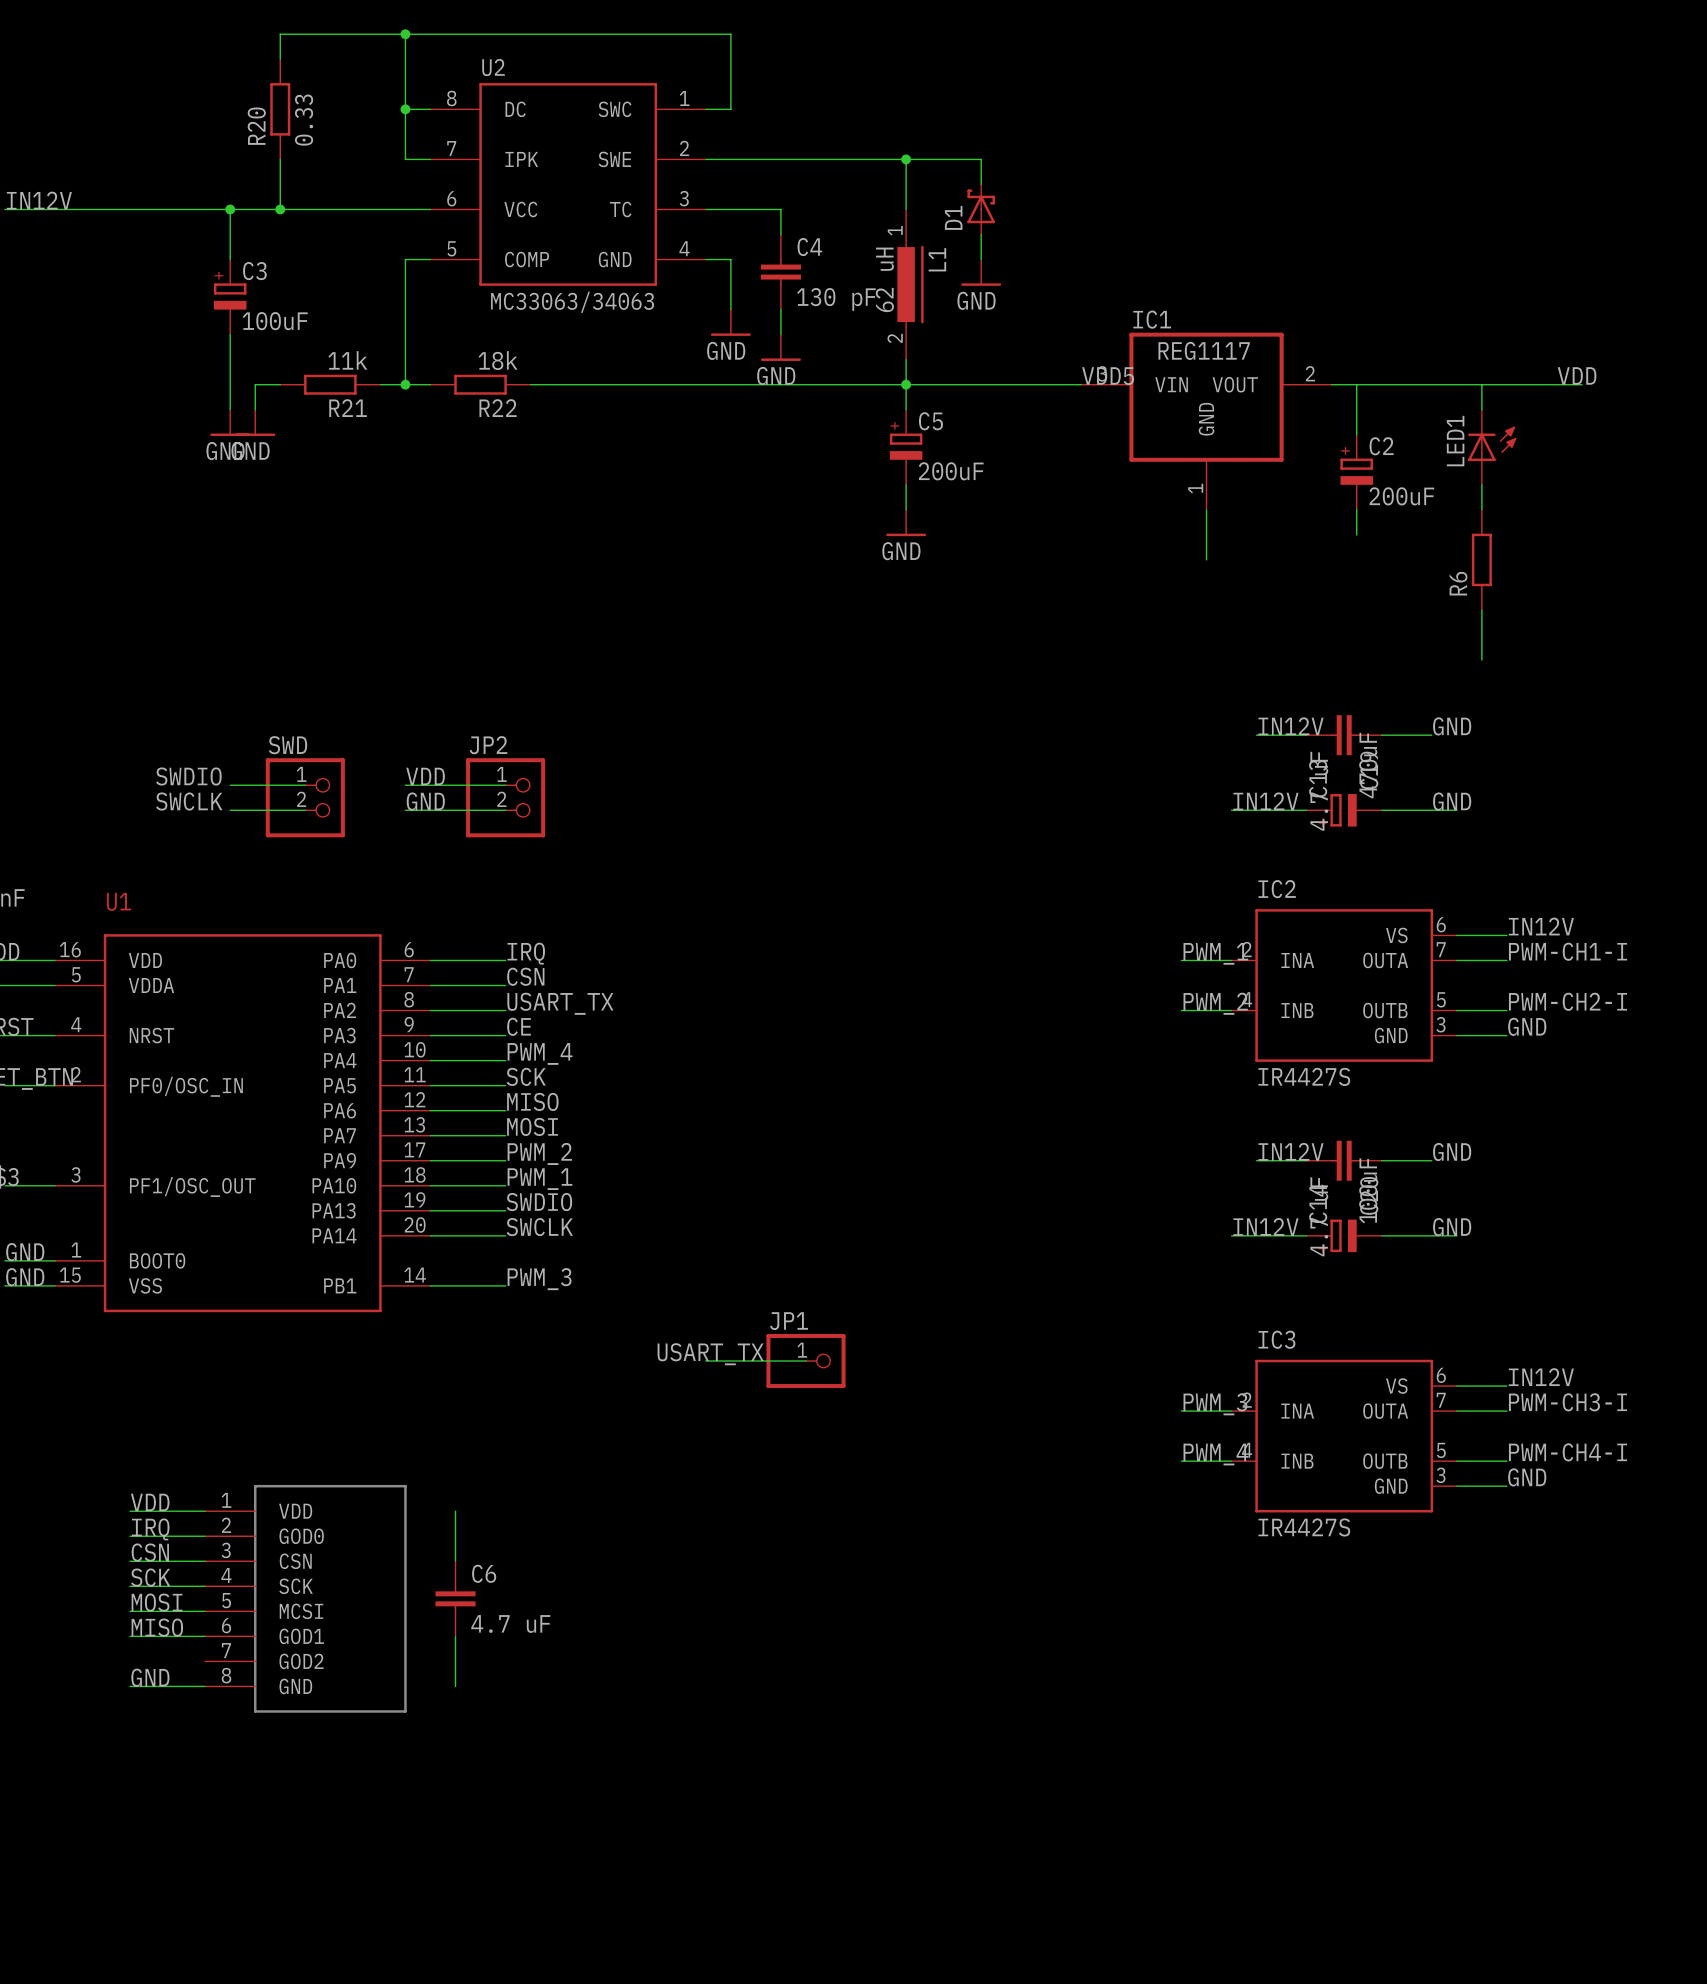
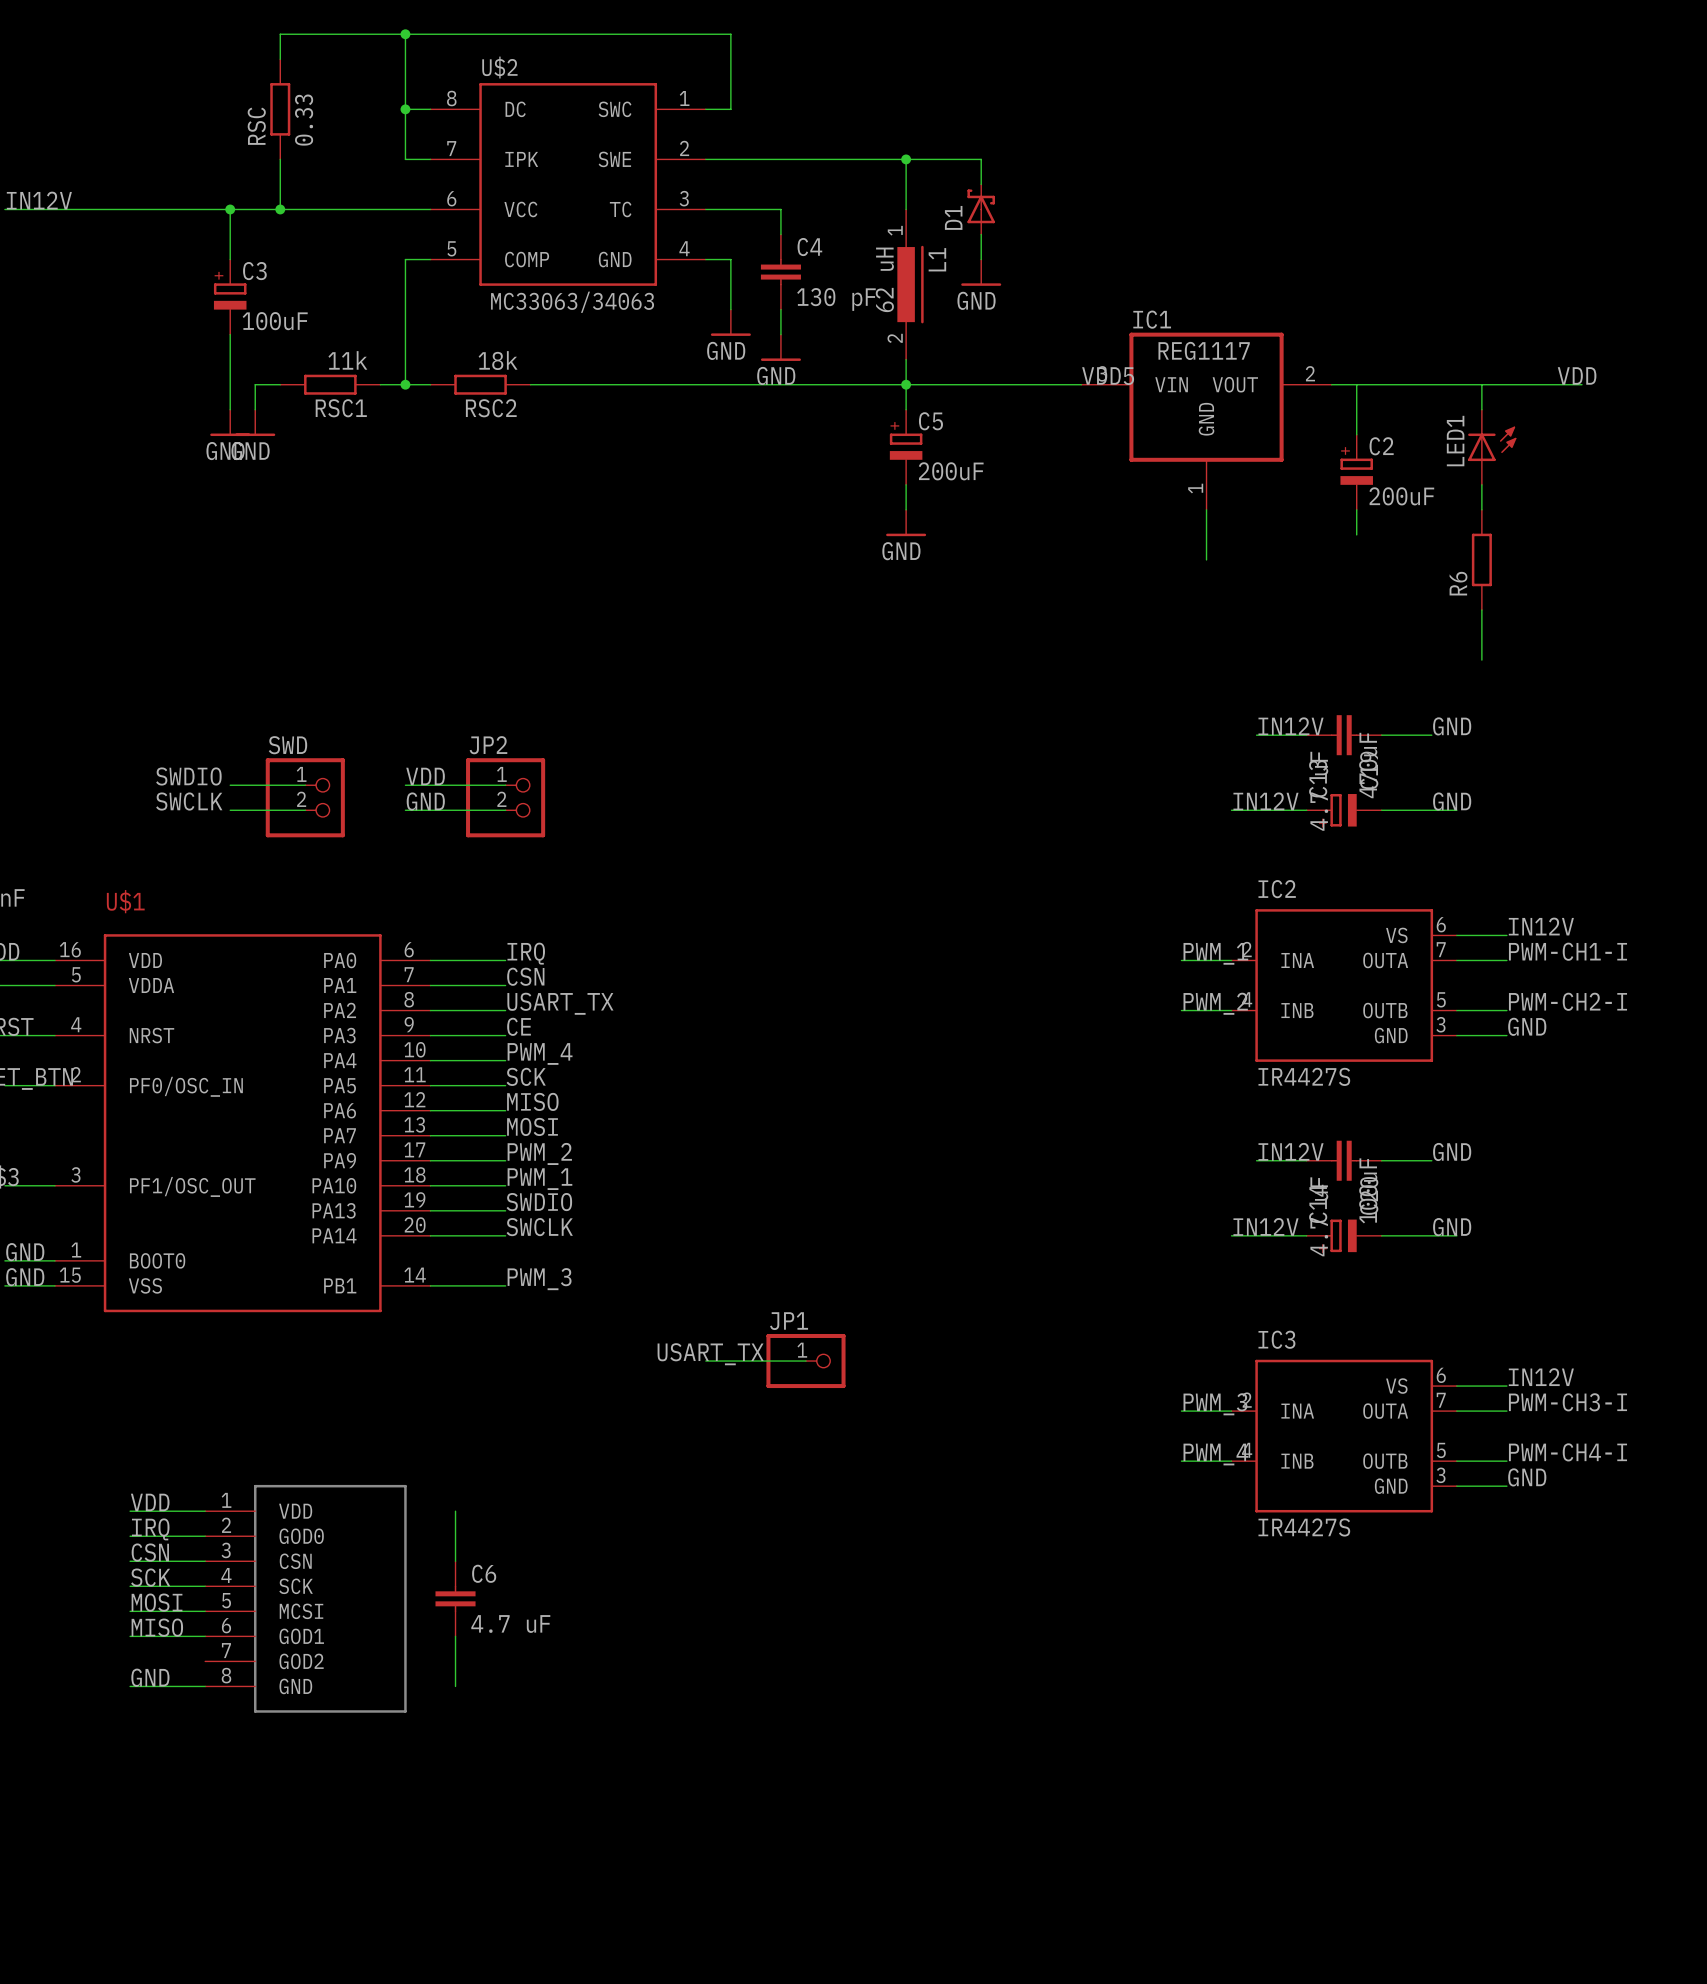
U2 name: U2 (493, 67) -> U$2 (499, 67)
R20 name: R20 (256, 126) -> RSC (256, 126)
R21 name: R21 (348, 408) -> RSC1 (341, 408)
R22 name: R22 (498, 408) -> RSC2 (491, 408)
U1 name: U1 (118, 901) -> U$1 (125, 901)

